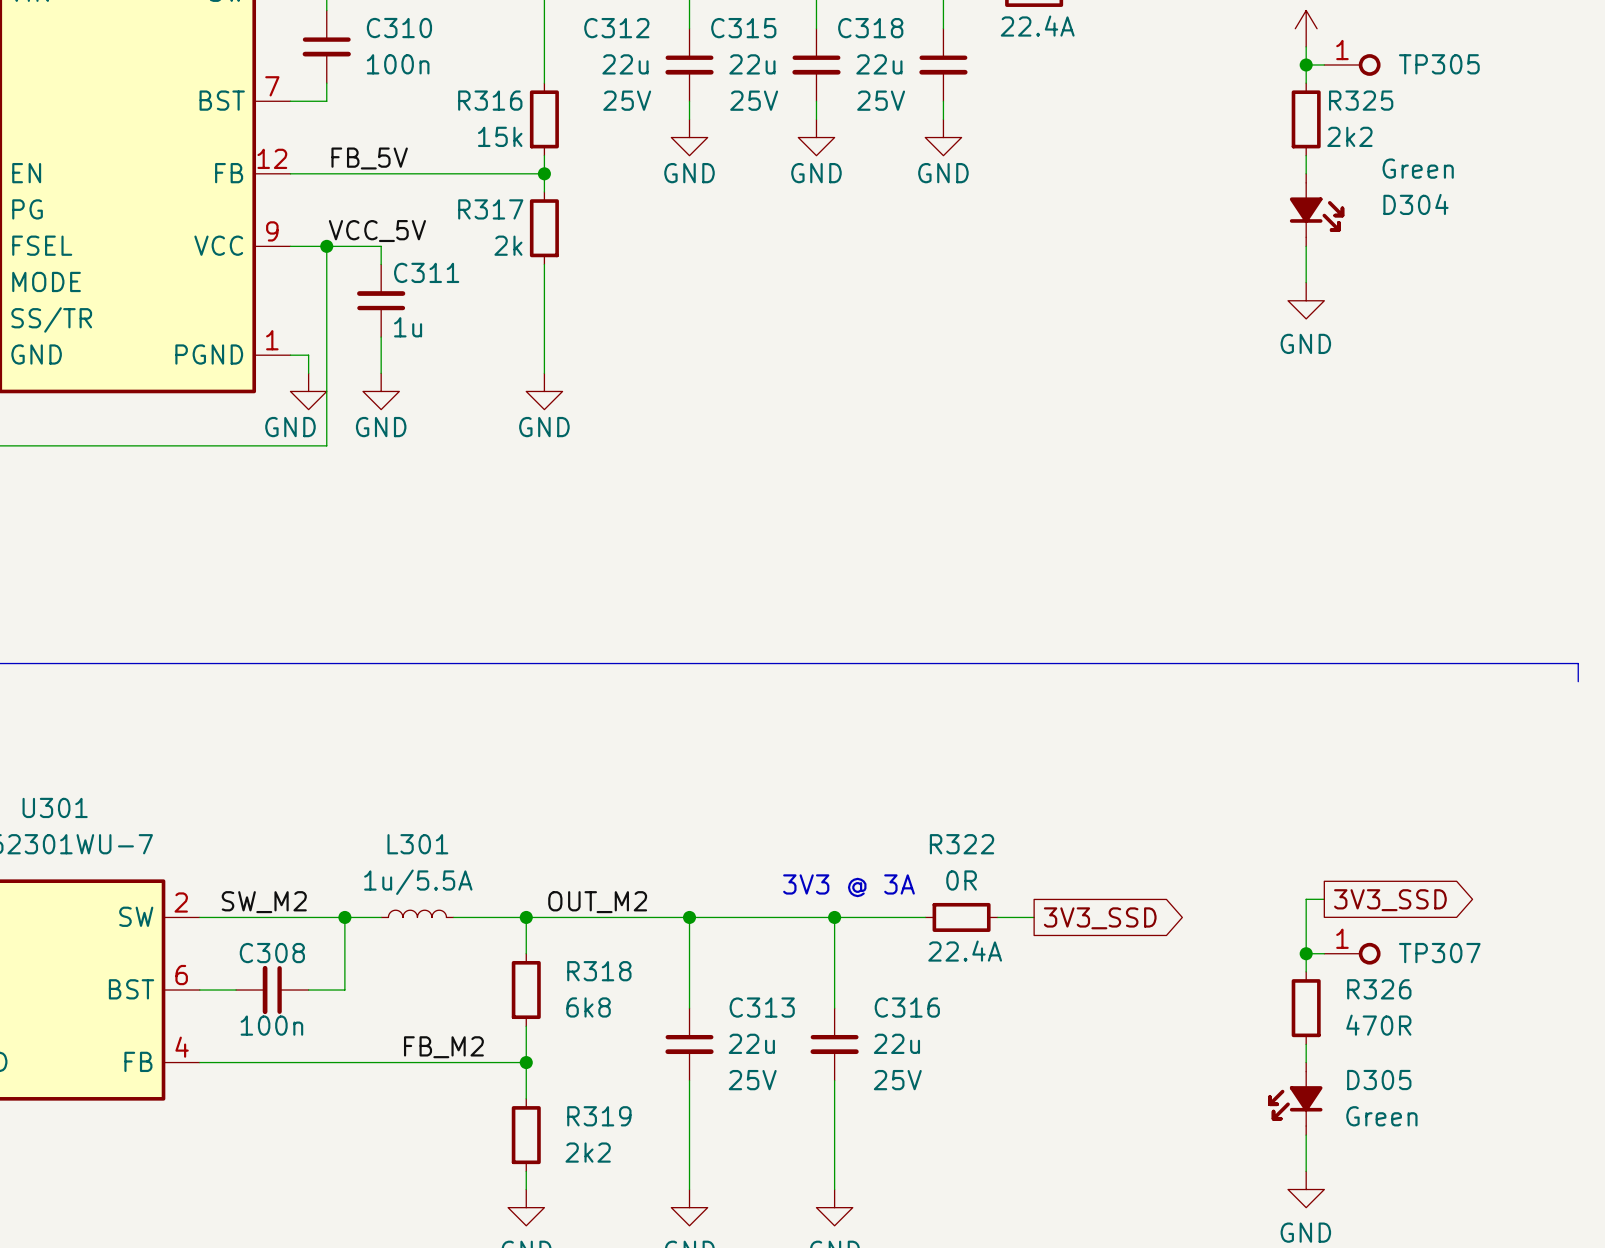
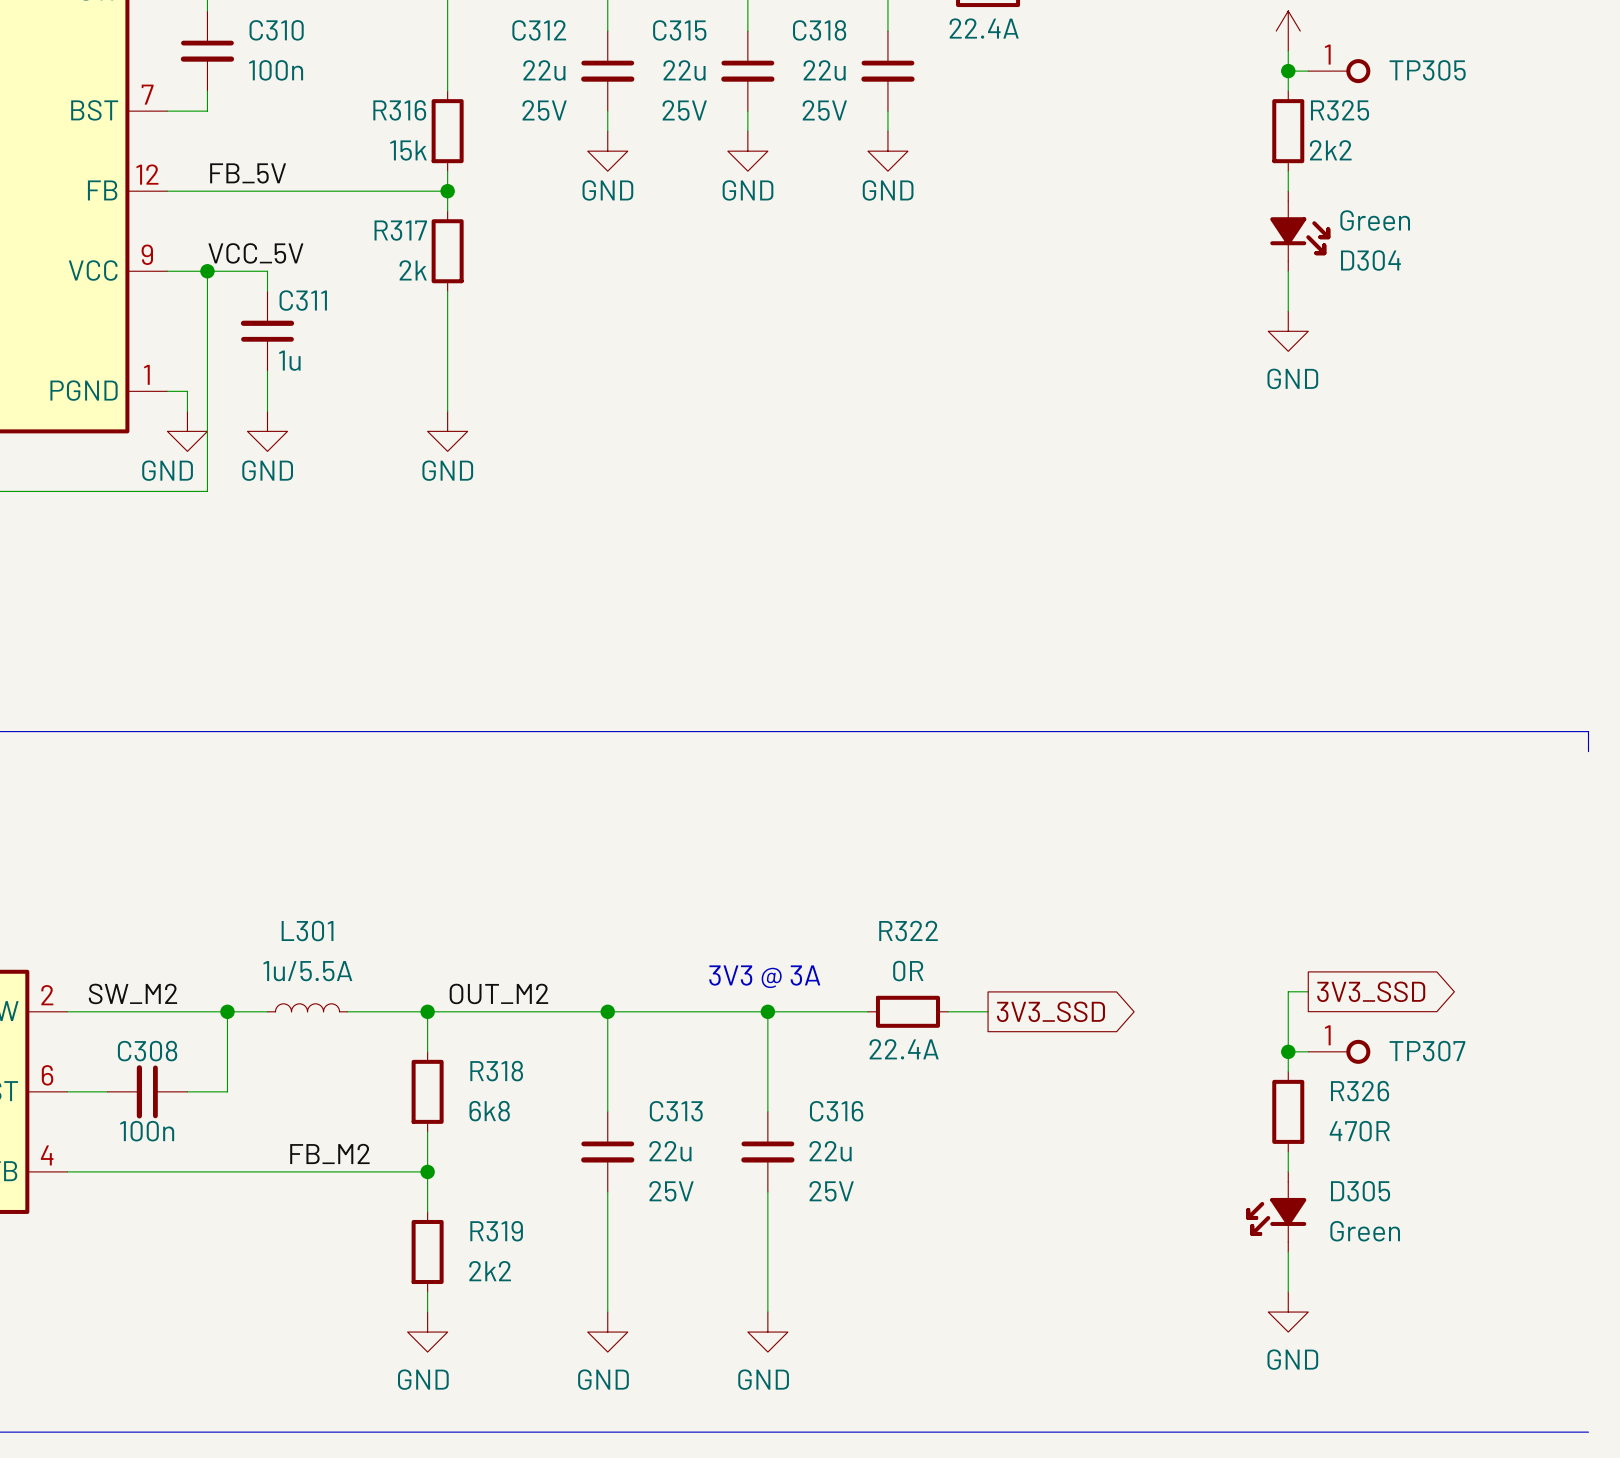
D304 text position: Green (1418, 168) -> Green (1375, 220)
D304 name position: D304 (1415, 204) -> D304 (1370, 260)

